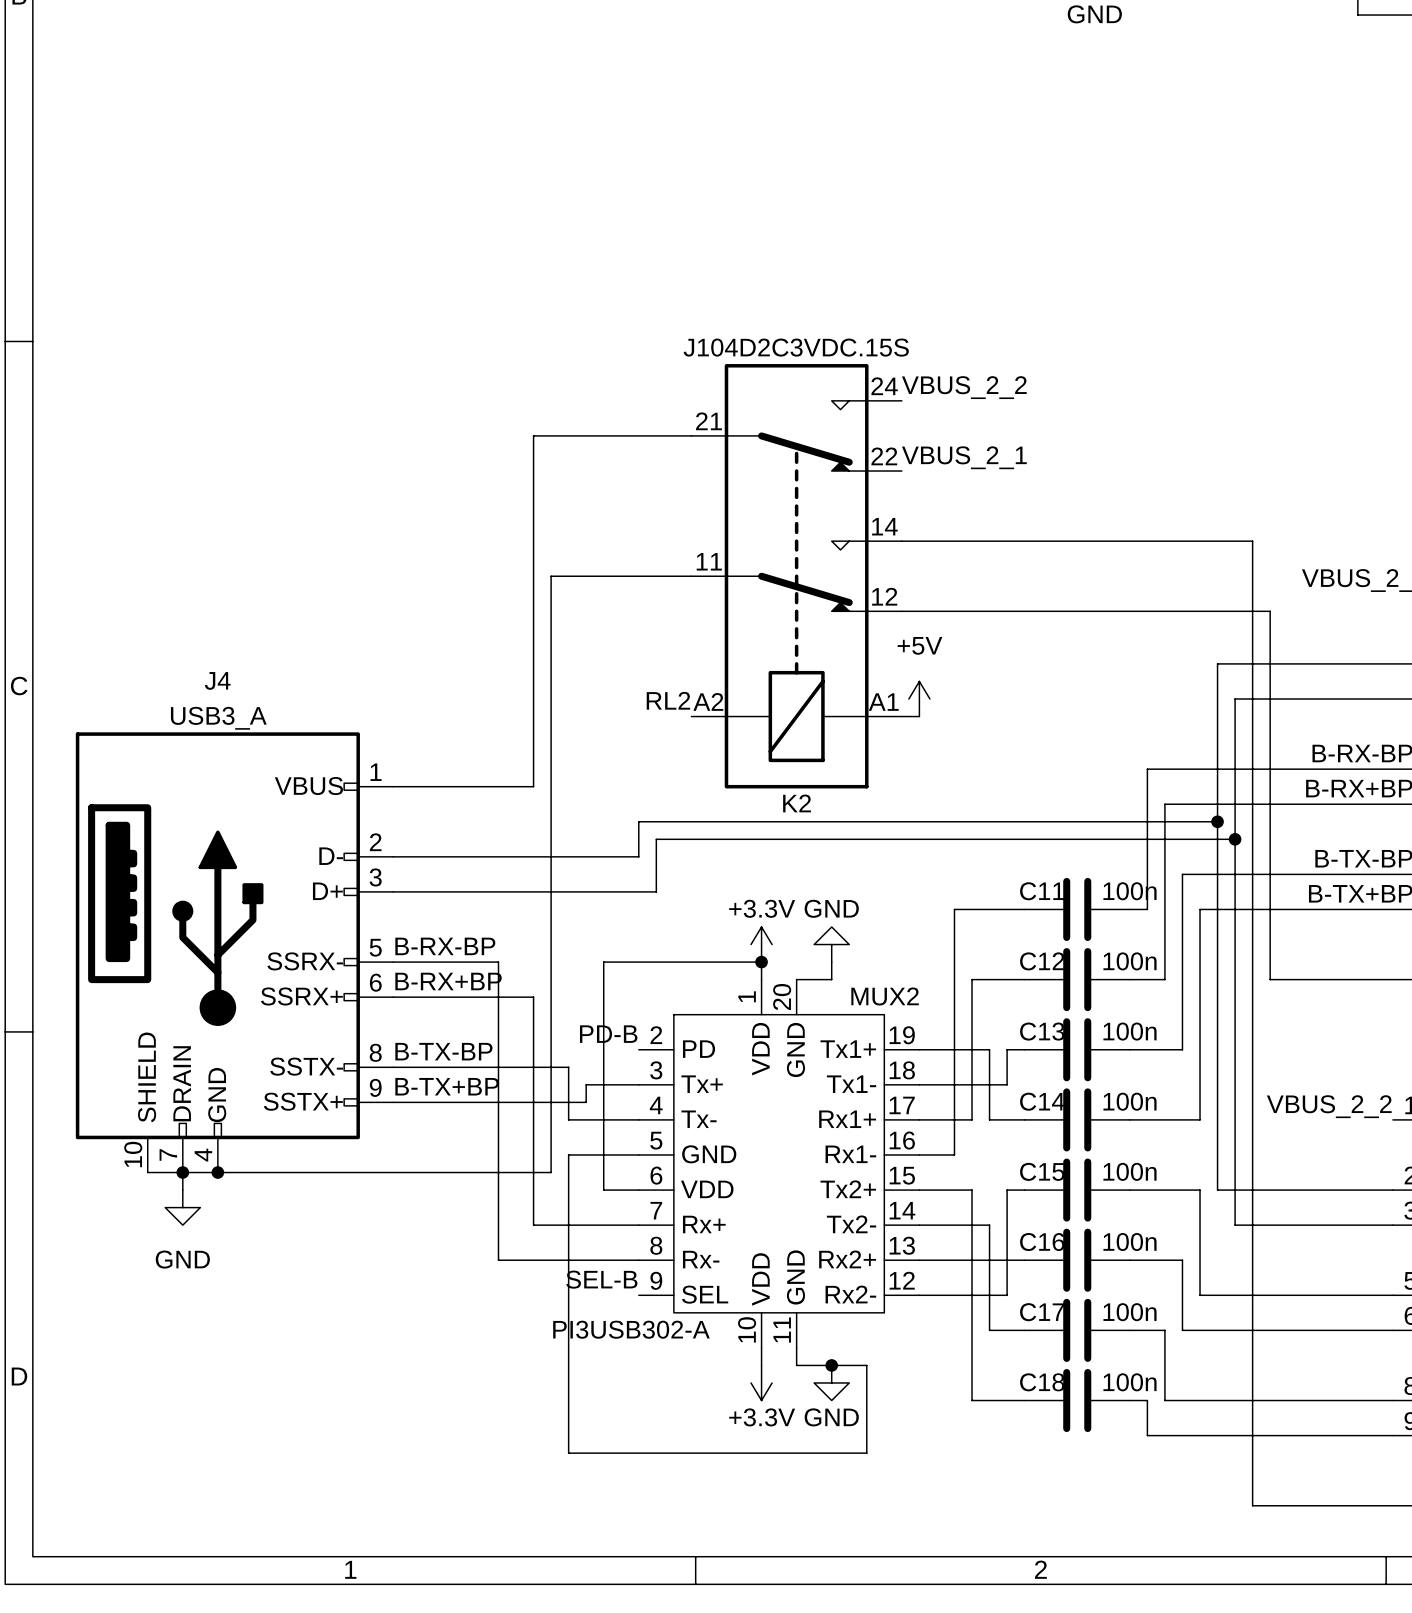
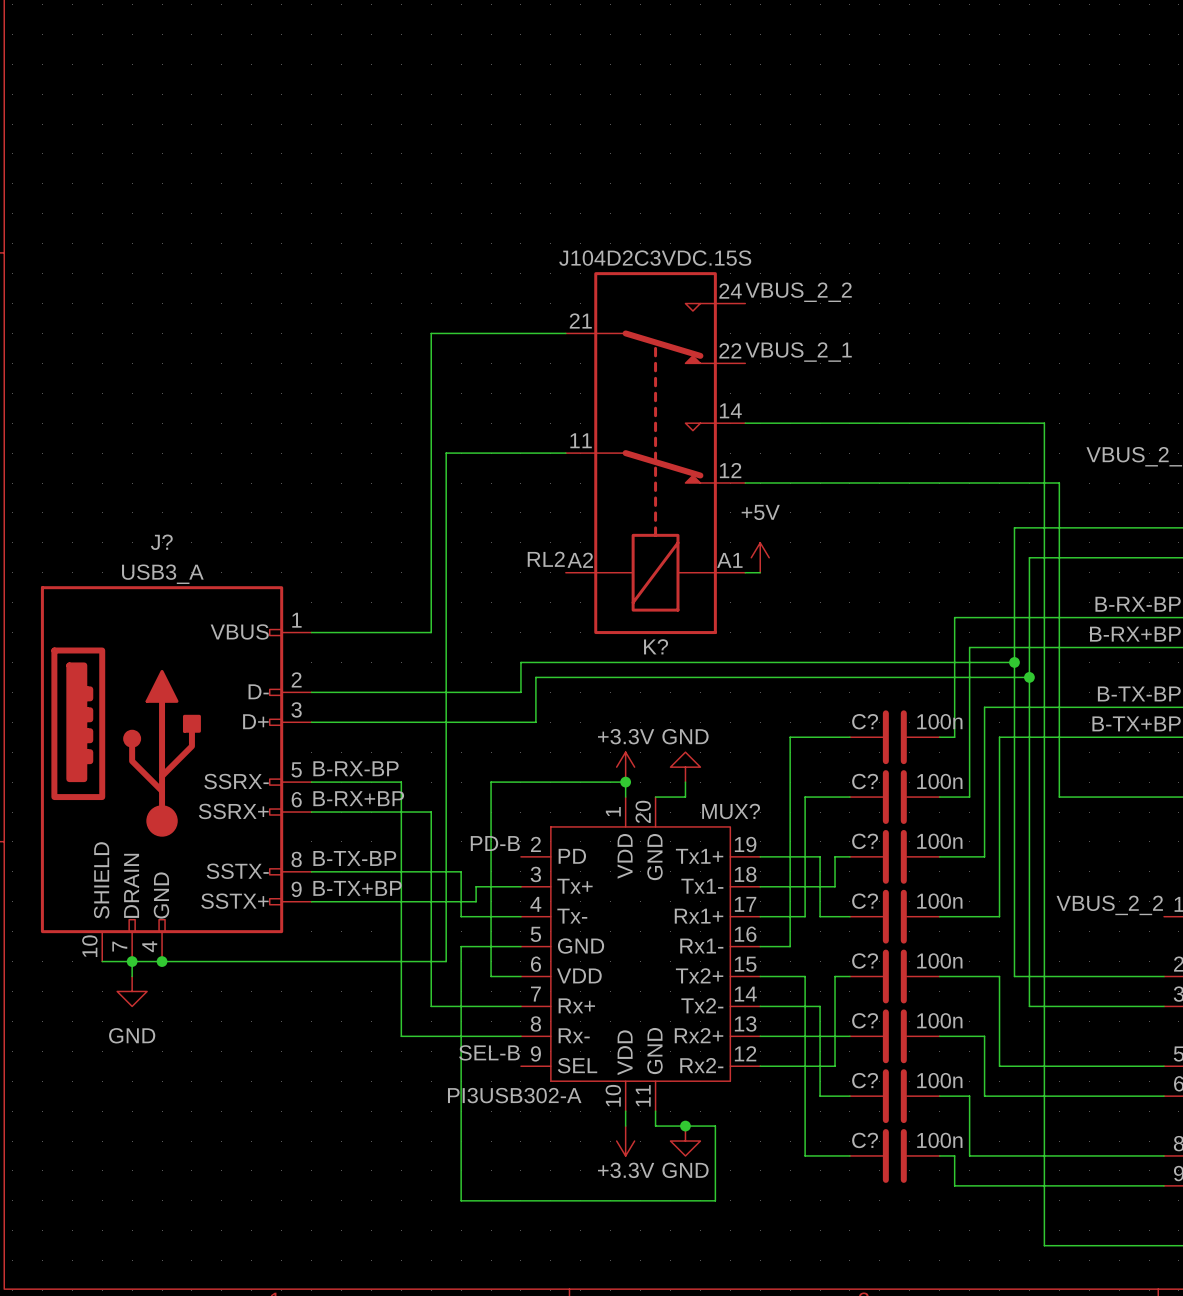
J4 name: J4 (217, 680) -> J? (161, 542)
K2 name: K2 (797, 803) -> K? (656, 646)
C11 name: C11 (1042, 891) -> C? (865, 721)
C12 name: C12 (1042, 961) -> C? (865, 781)
MUX2 name: MUX2 (885, 996) -> MUX? (731, 811)
C13 name: C13 (1042, 1031) -> C? (865, 841)
C14 name: C14 (1042, 1101) -> C? (865, 901)
C15 name: C15 (1042, 1171) -> C? (865, 960)
C16 name: C16 (1042, 1242) -> C? (865, 1020)
C17 name: C17 (1042, 1312) -> C? (865, 1080)
C18 name: C18 (1042, 1382) -> C? (865, 1140)

